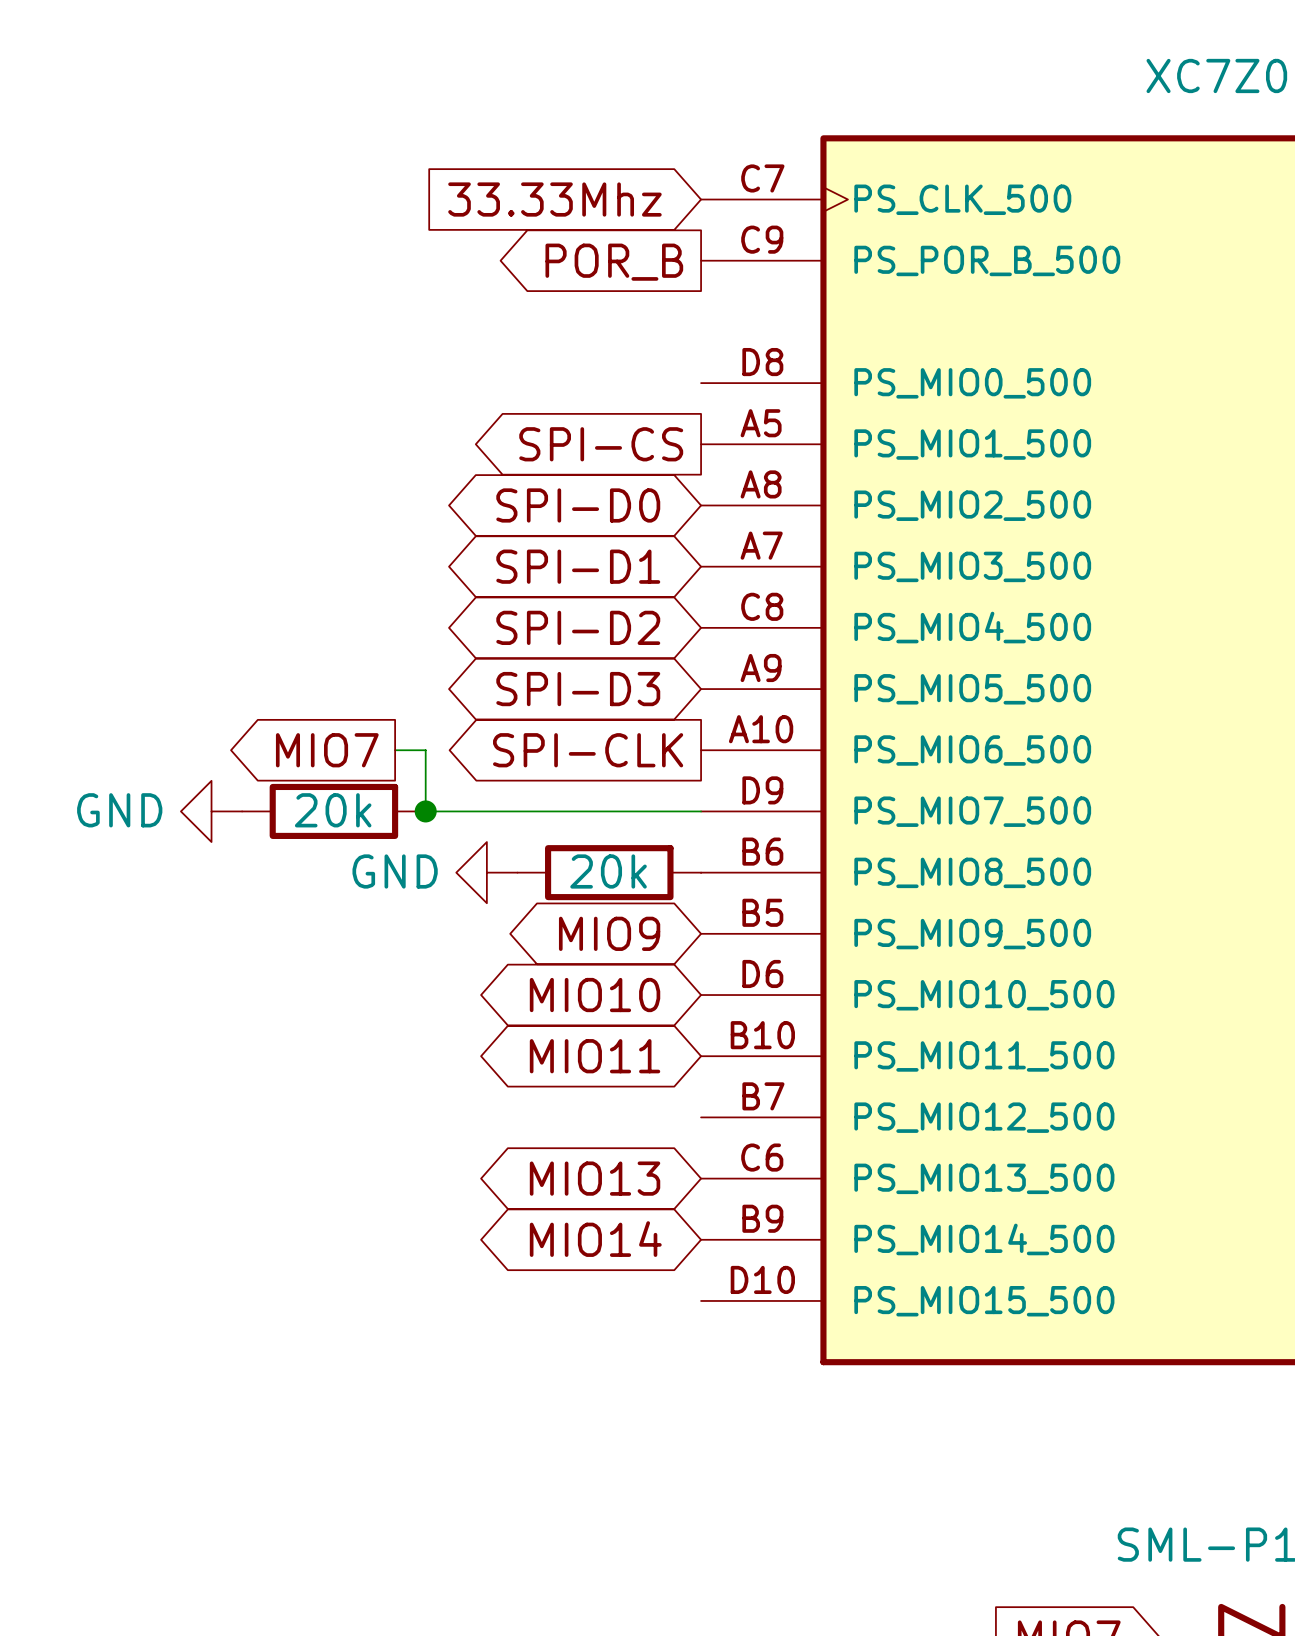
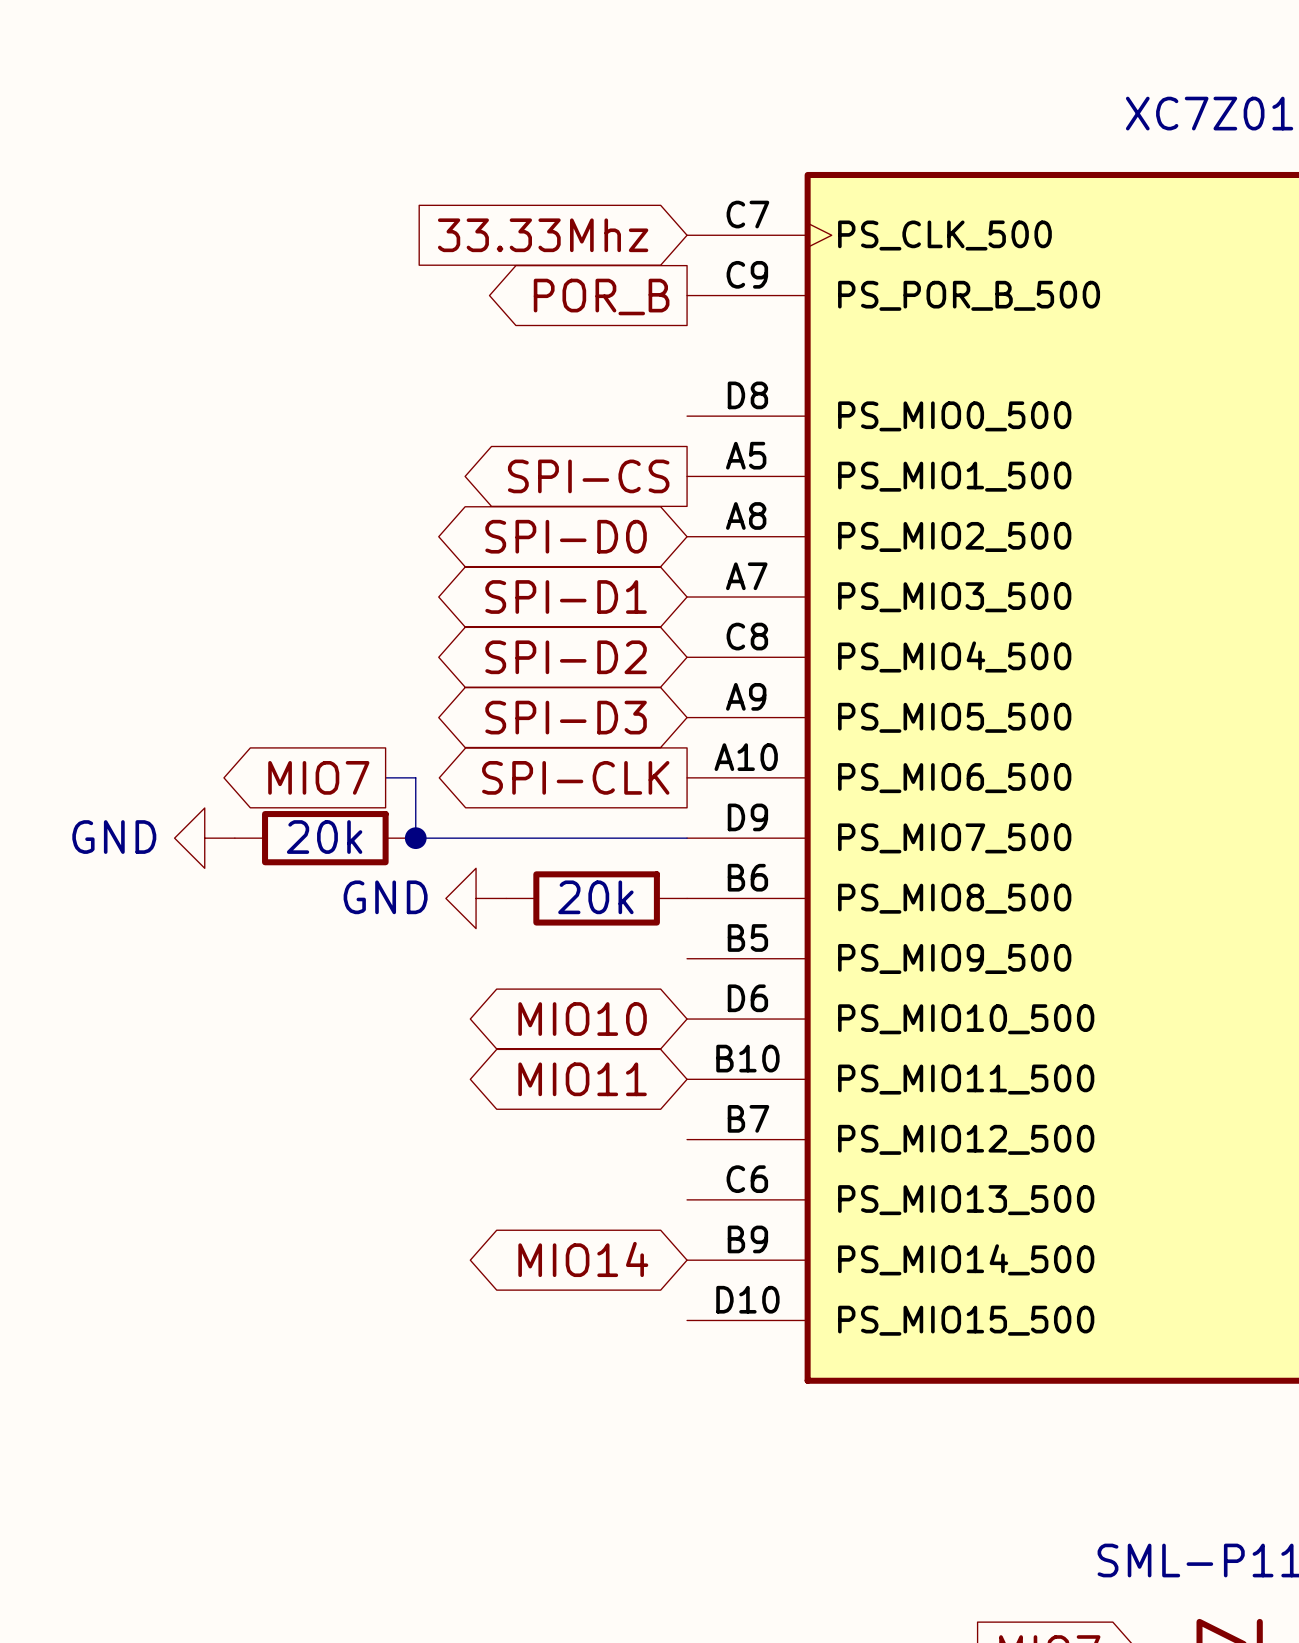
global label: MIO9 (609, 933) -> none
global label: MIO13 (595, 1178) -> none

